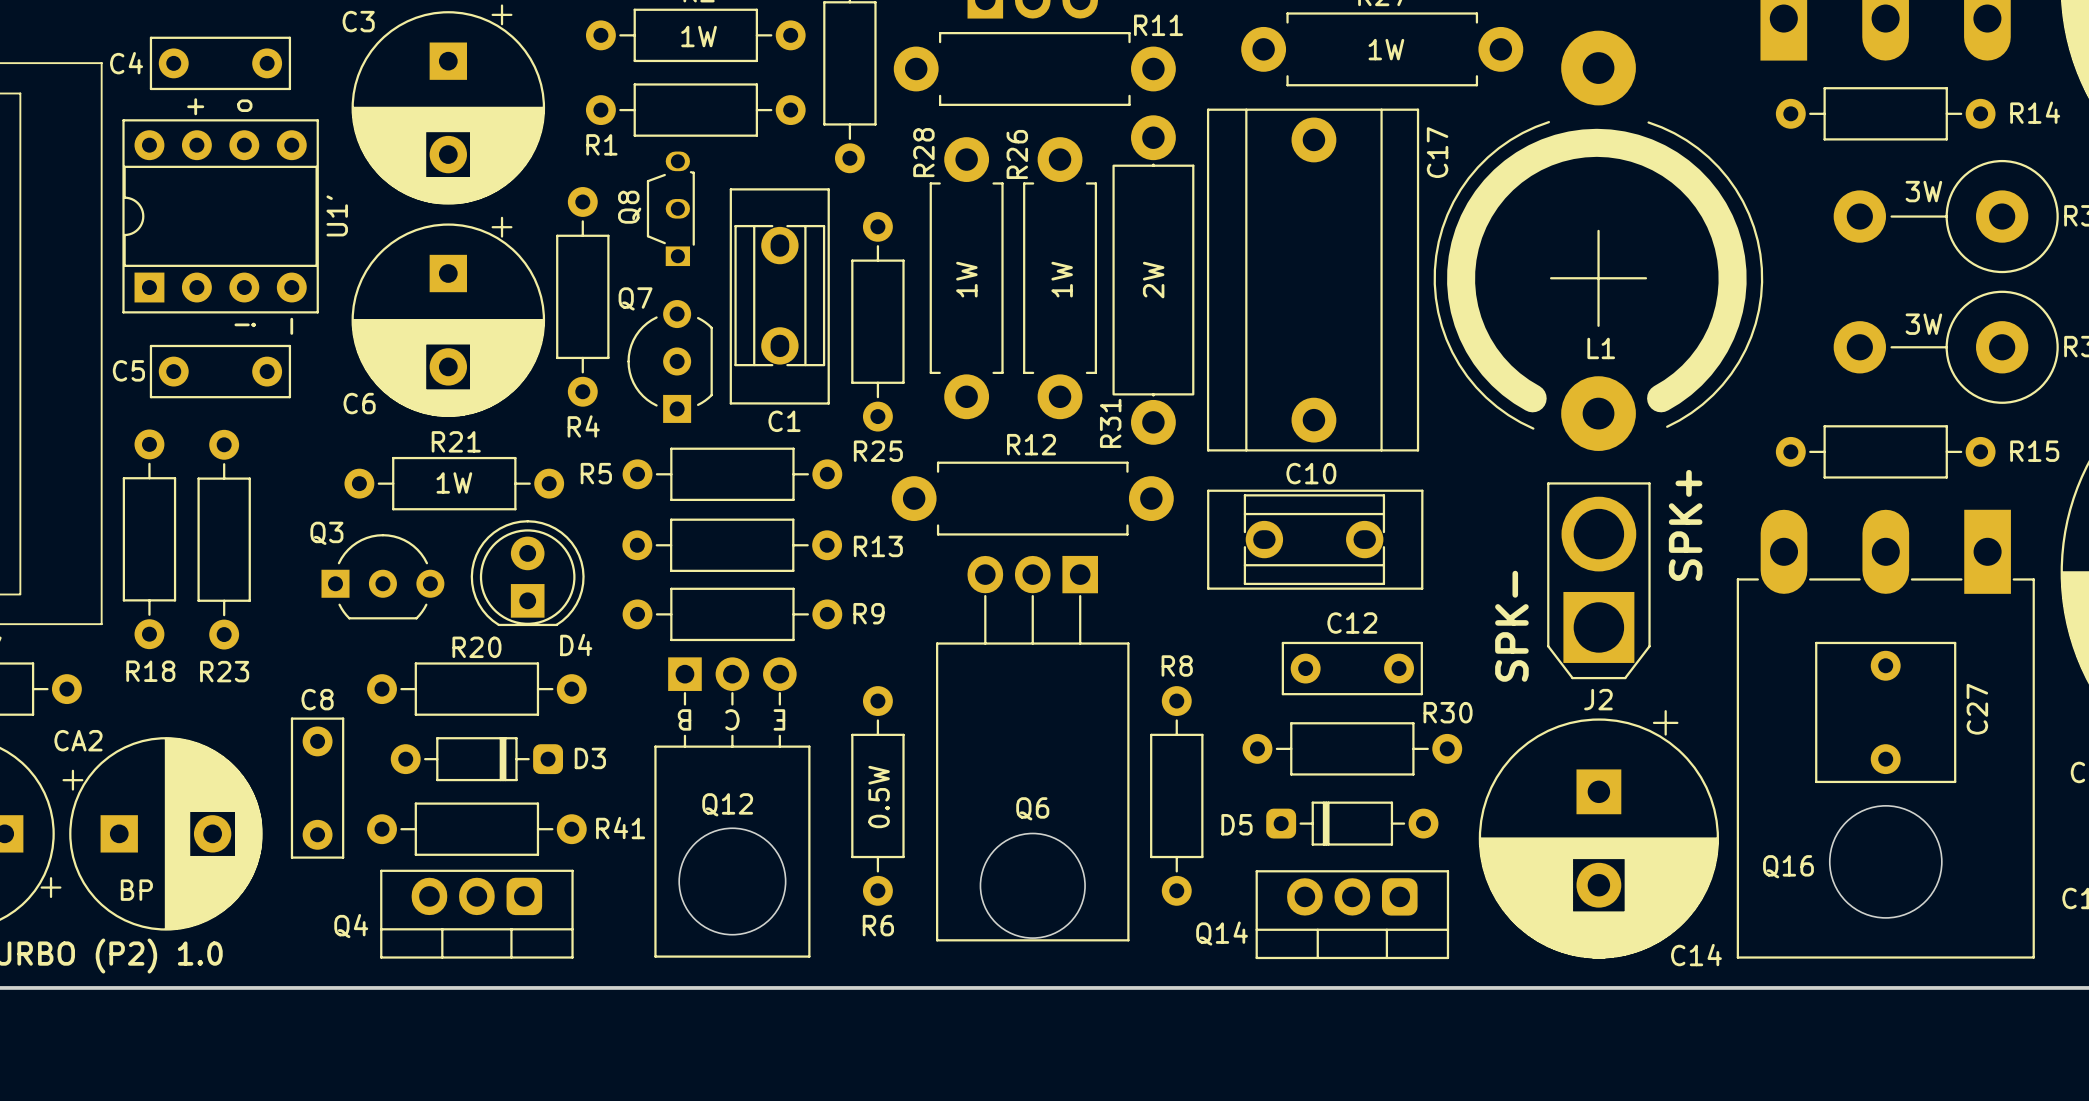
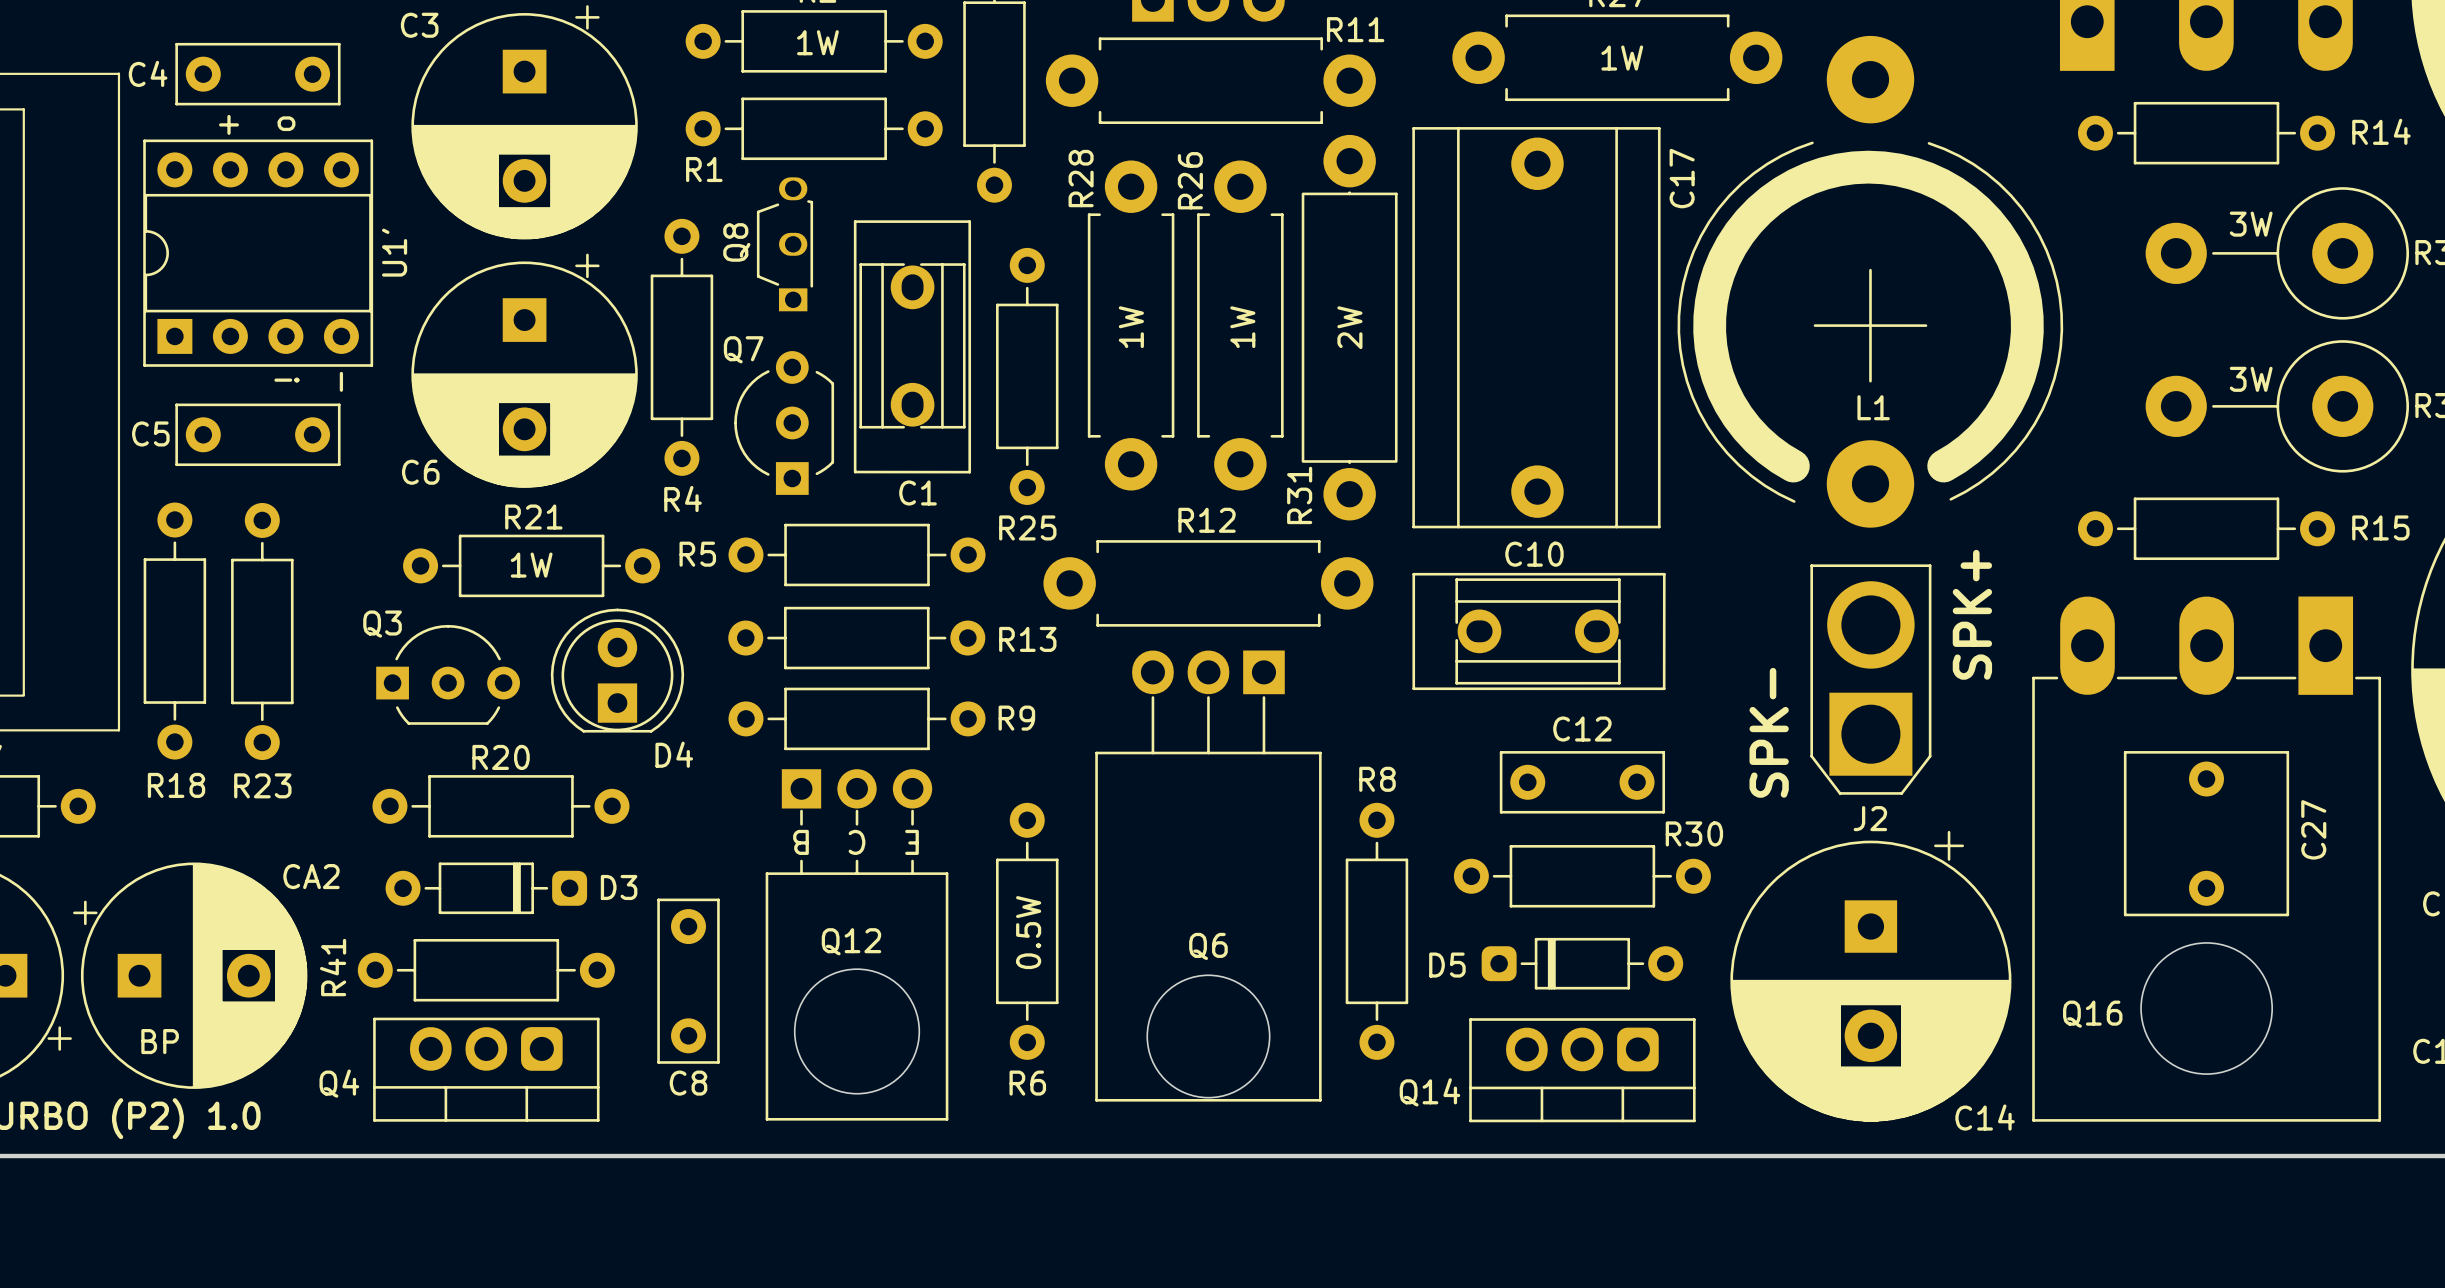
R20 position: (476, 689) -> (500, 806)
C8 name position: C8 (317, 699) -> C8 (688, 1083)
CA2 name position: CA2 (78, 740) -> CA2 (311, 876)
D3 position: (476, 759) -> (486, 888)
C8 position: (317, 788) -> (688, 981)
R41 name rotation: 0° (620, 828) -> 90° counterclockwise (333, 967)
R41 name position: R41 (620, 828) -> R41 (333, 967)
R41 position: (476, 829) -> (486, 970)
Q4 position: (476, 914) -> (486, 1069)

